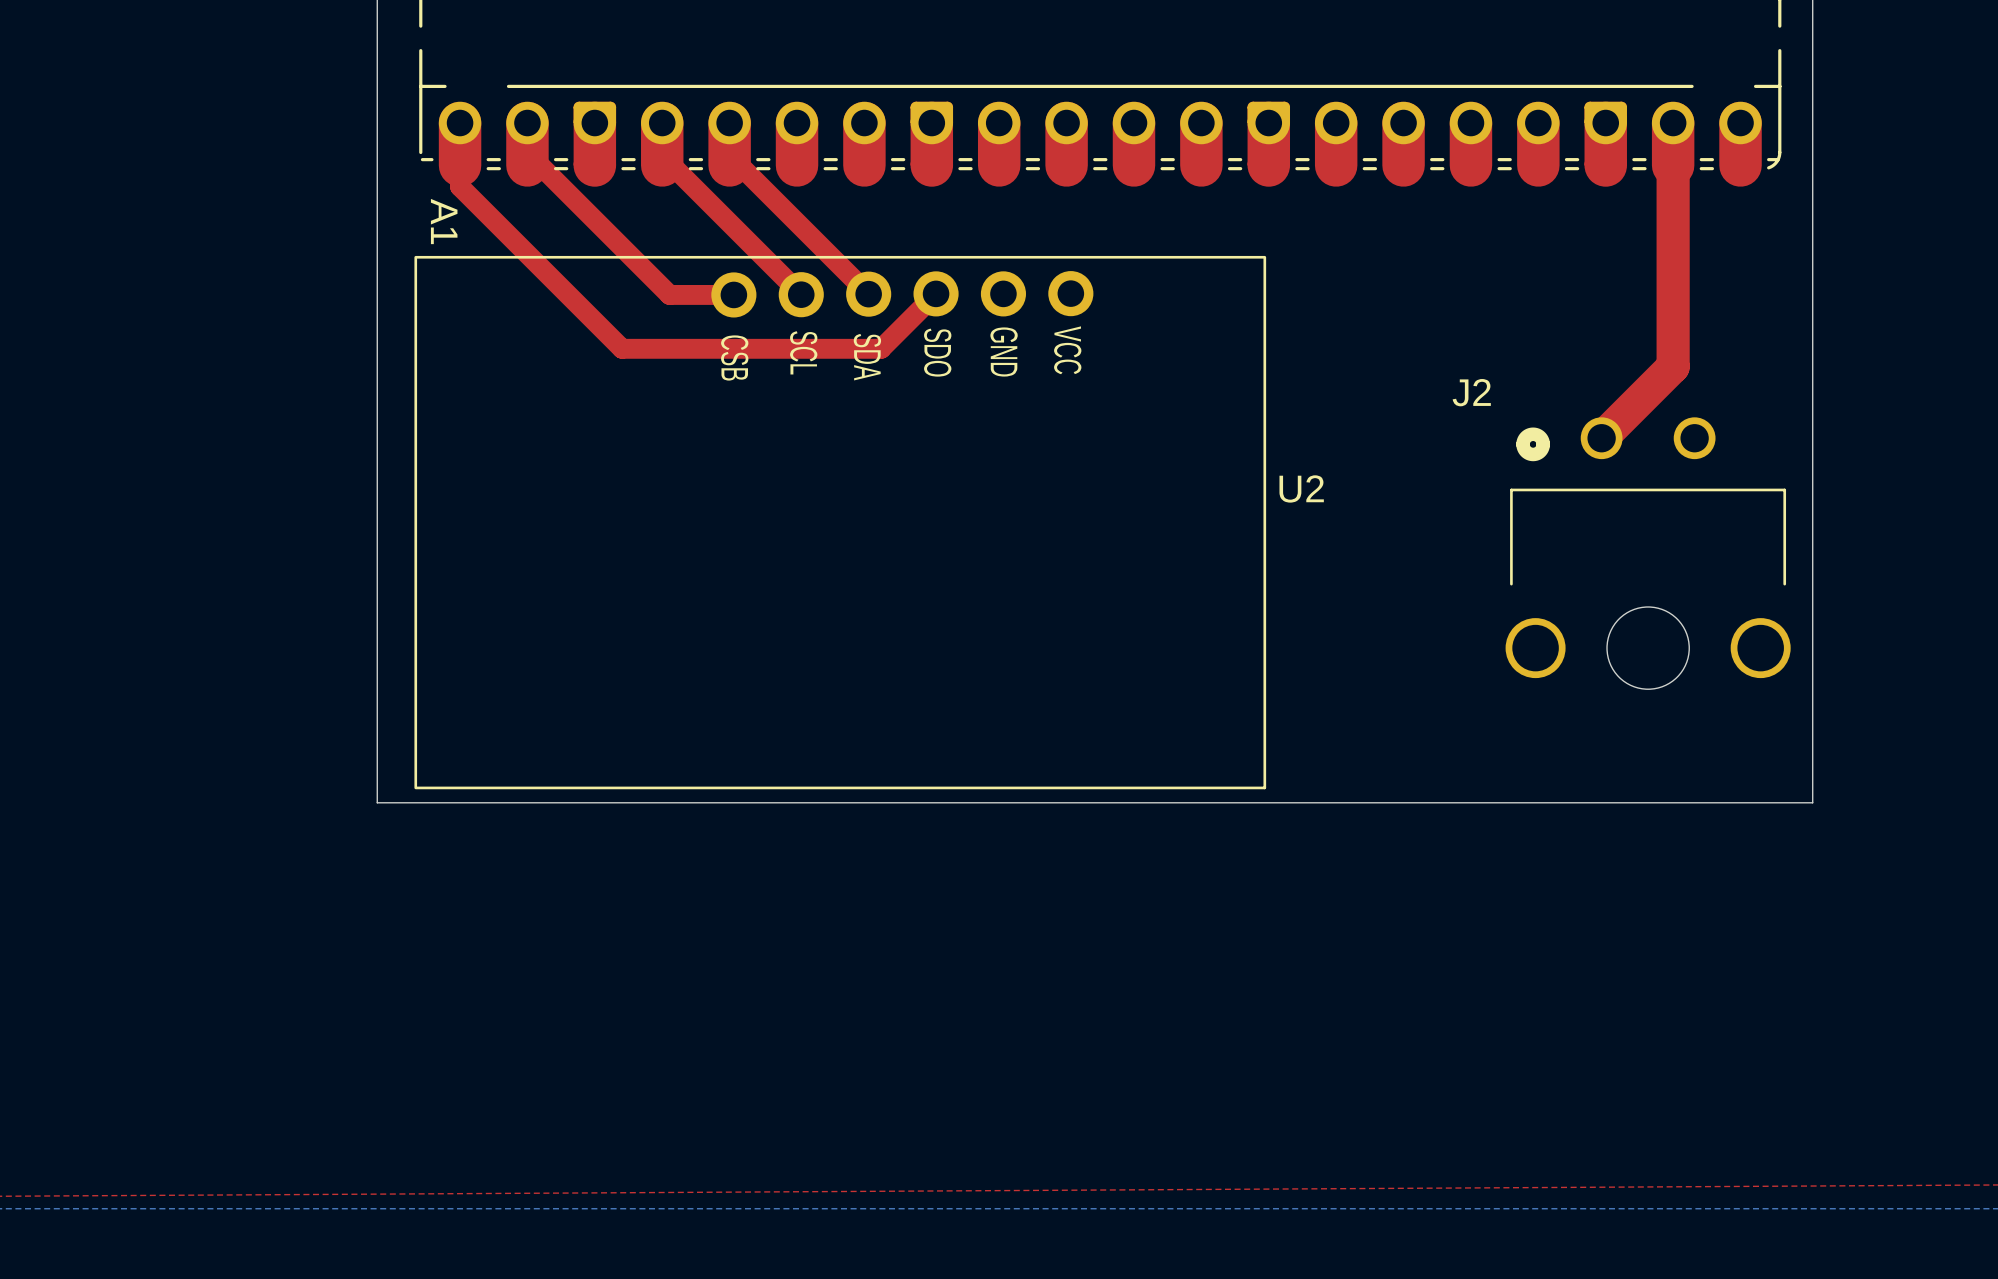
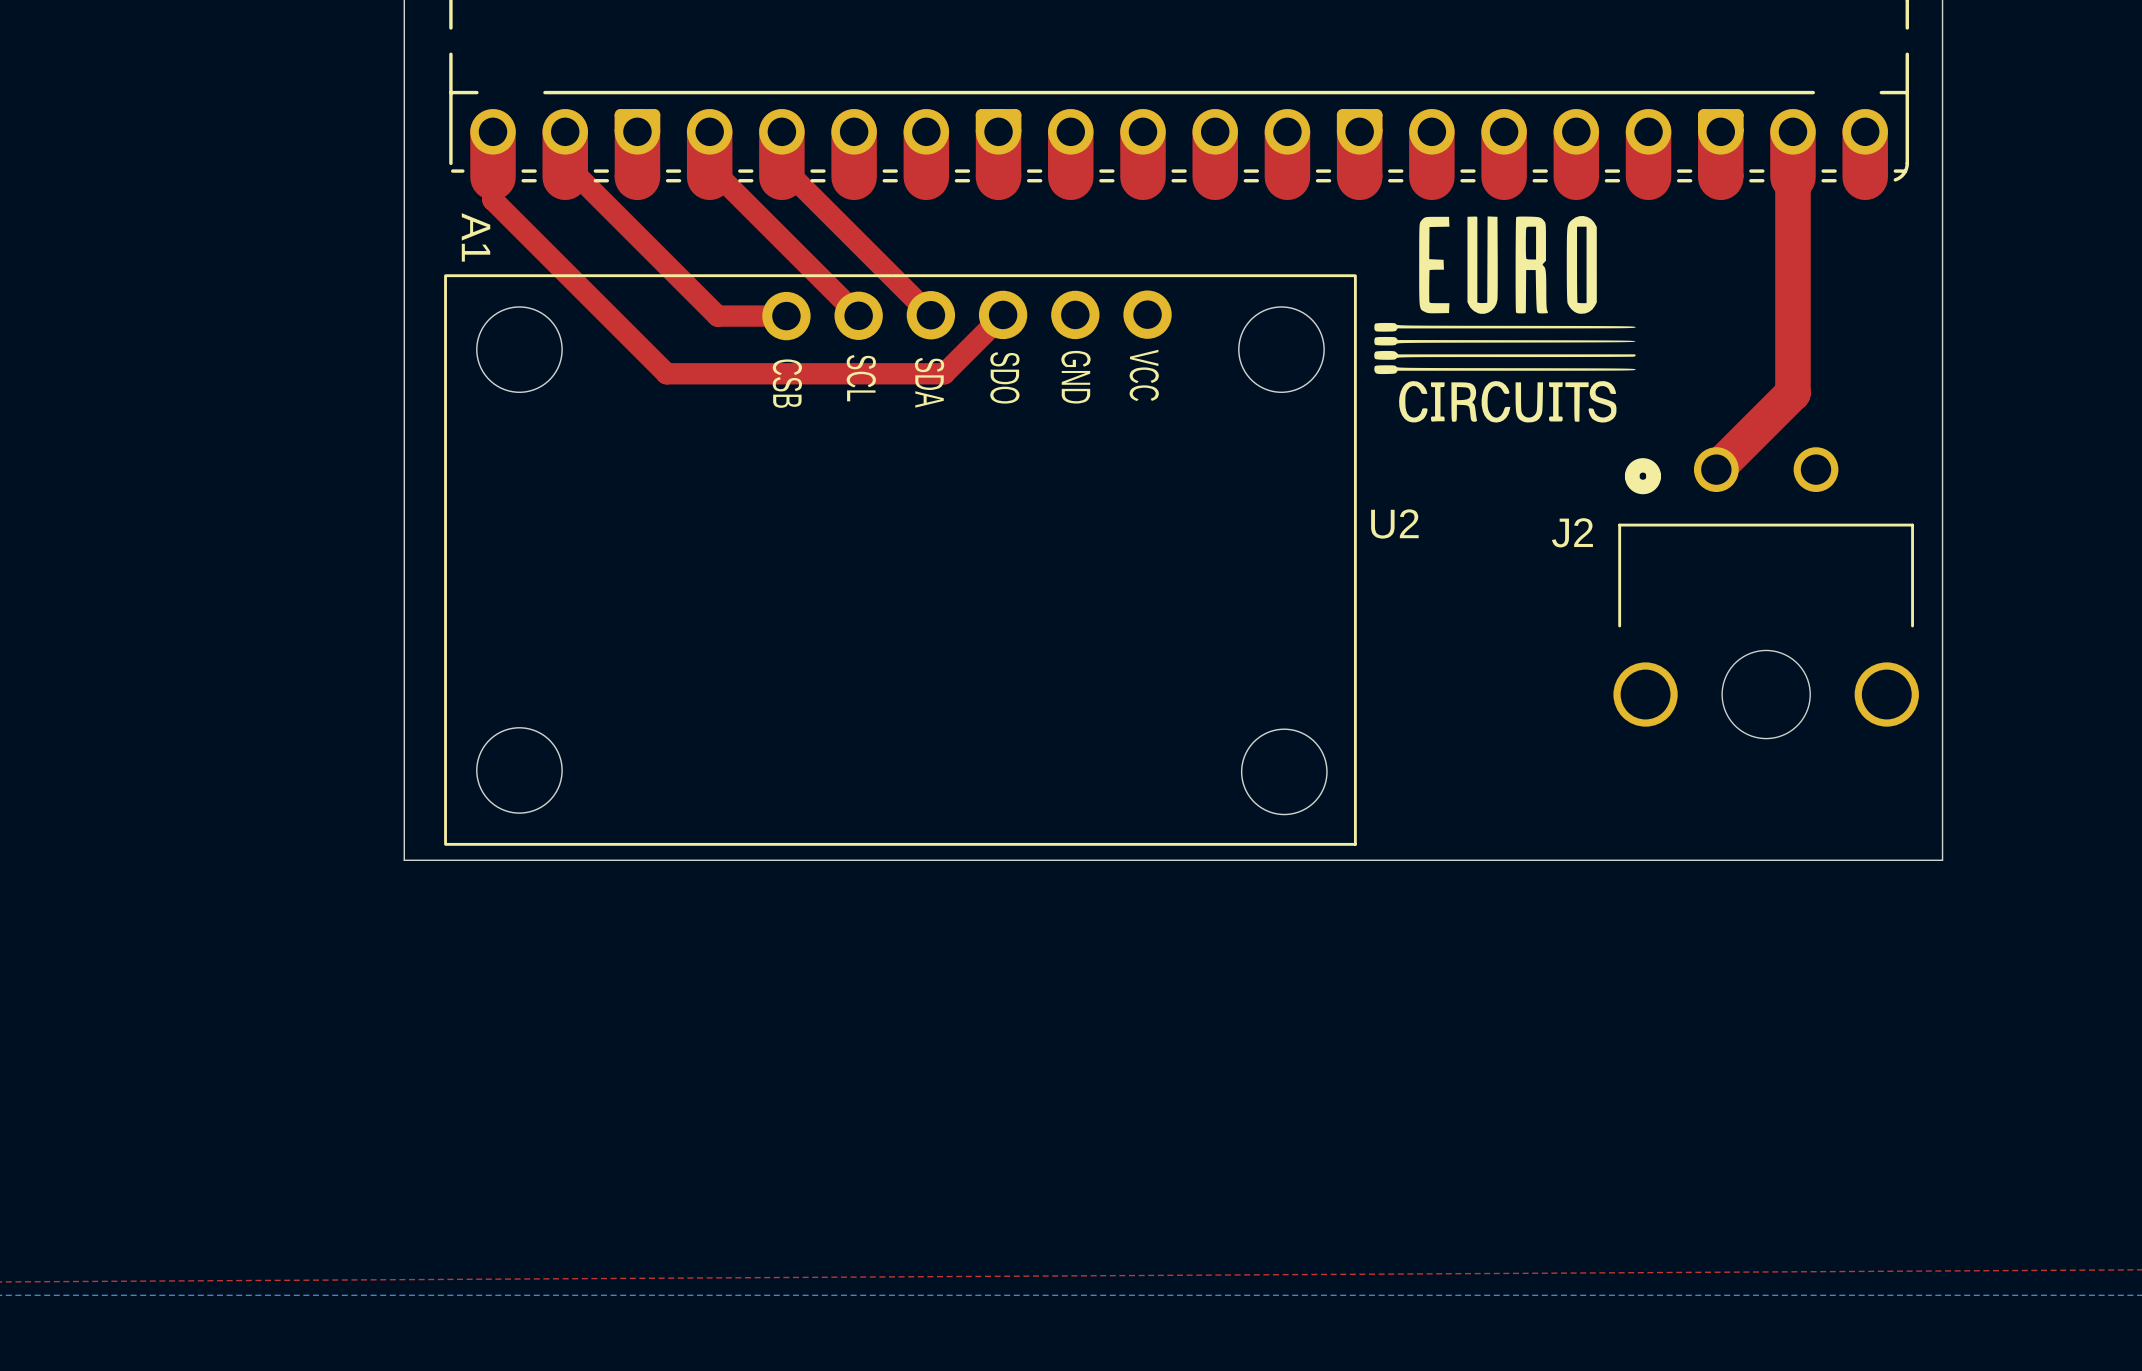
drawing: none -> [1374, 216, 1636, 423]
U2 footprint: [414, 255, 1267, 790] -> [444, 274, 1357, 846]
J2 name position: J2 (1471, 392) -> J2 (1572, 532)

